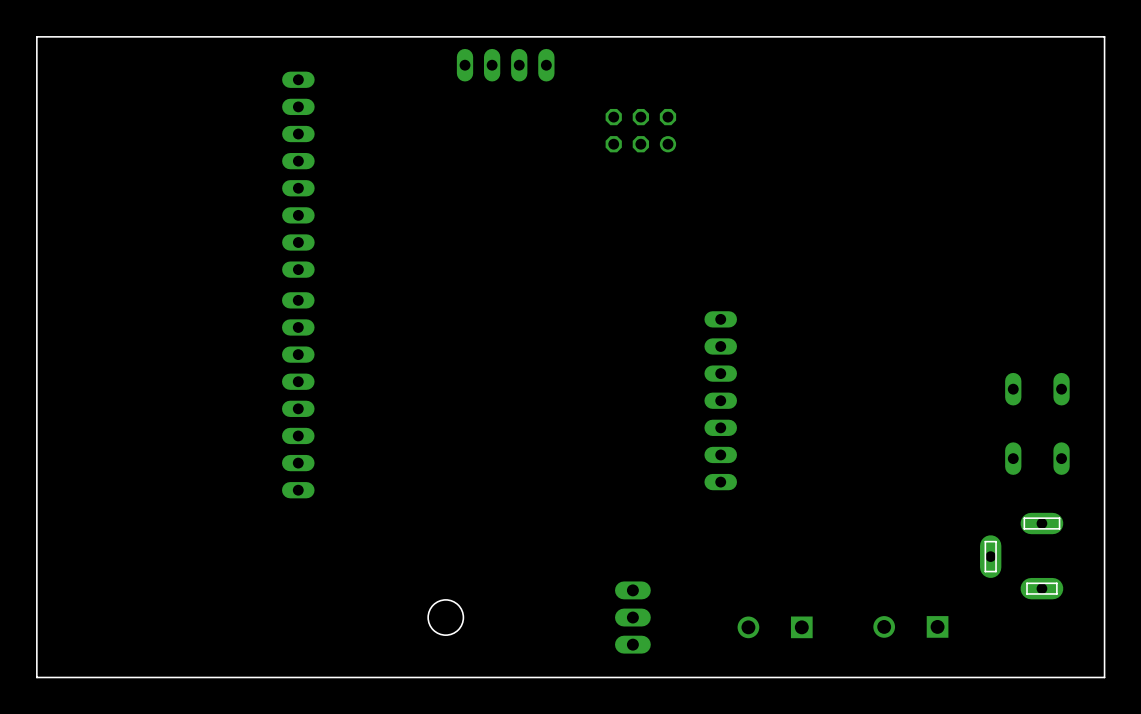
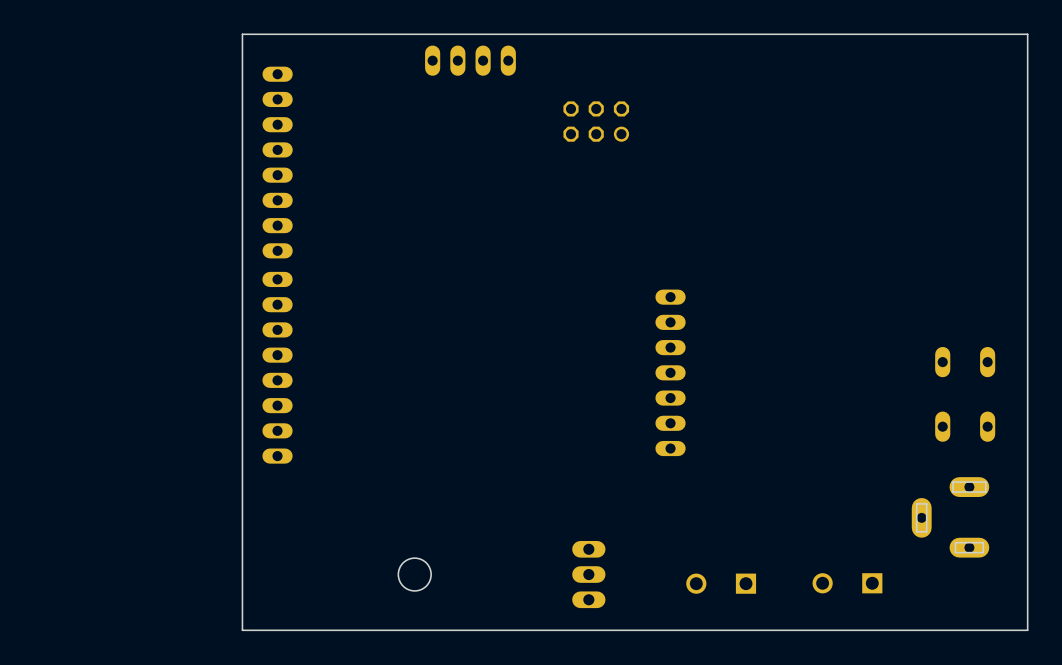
board edge: (260, 36) (36, 36) (36, 677) (260, 677) -> (242, 34) (242, 630)

